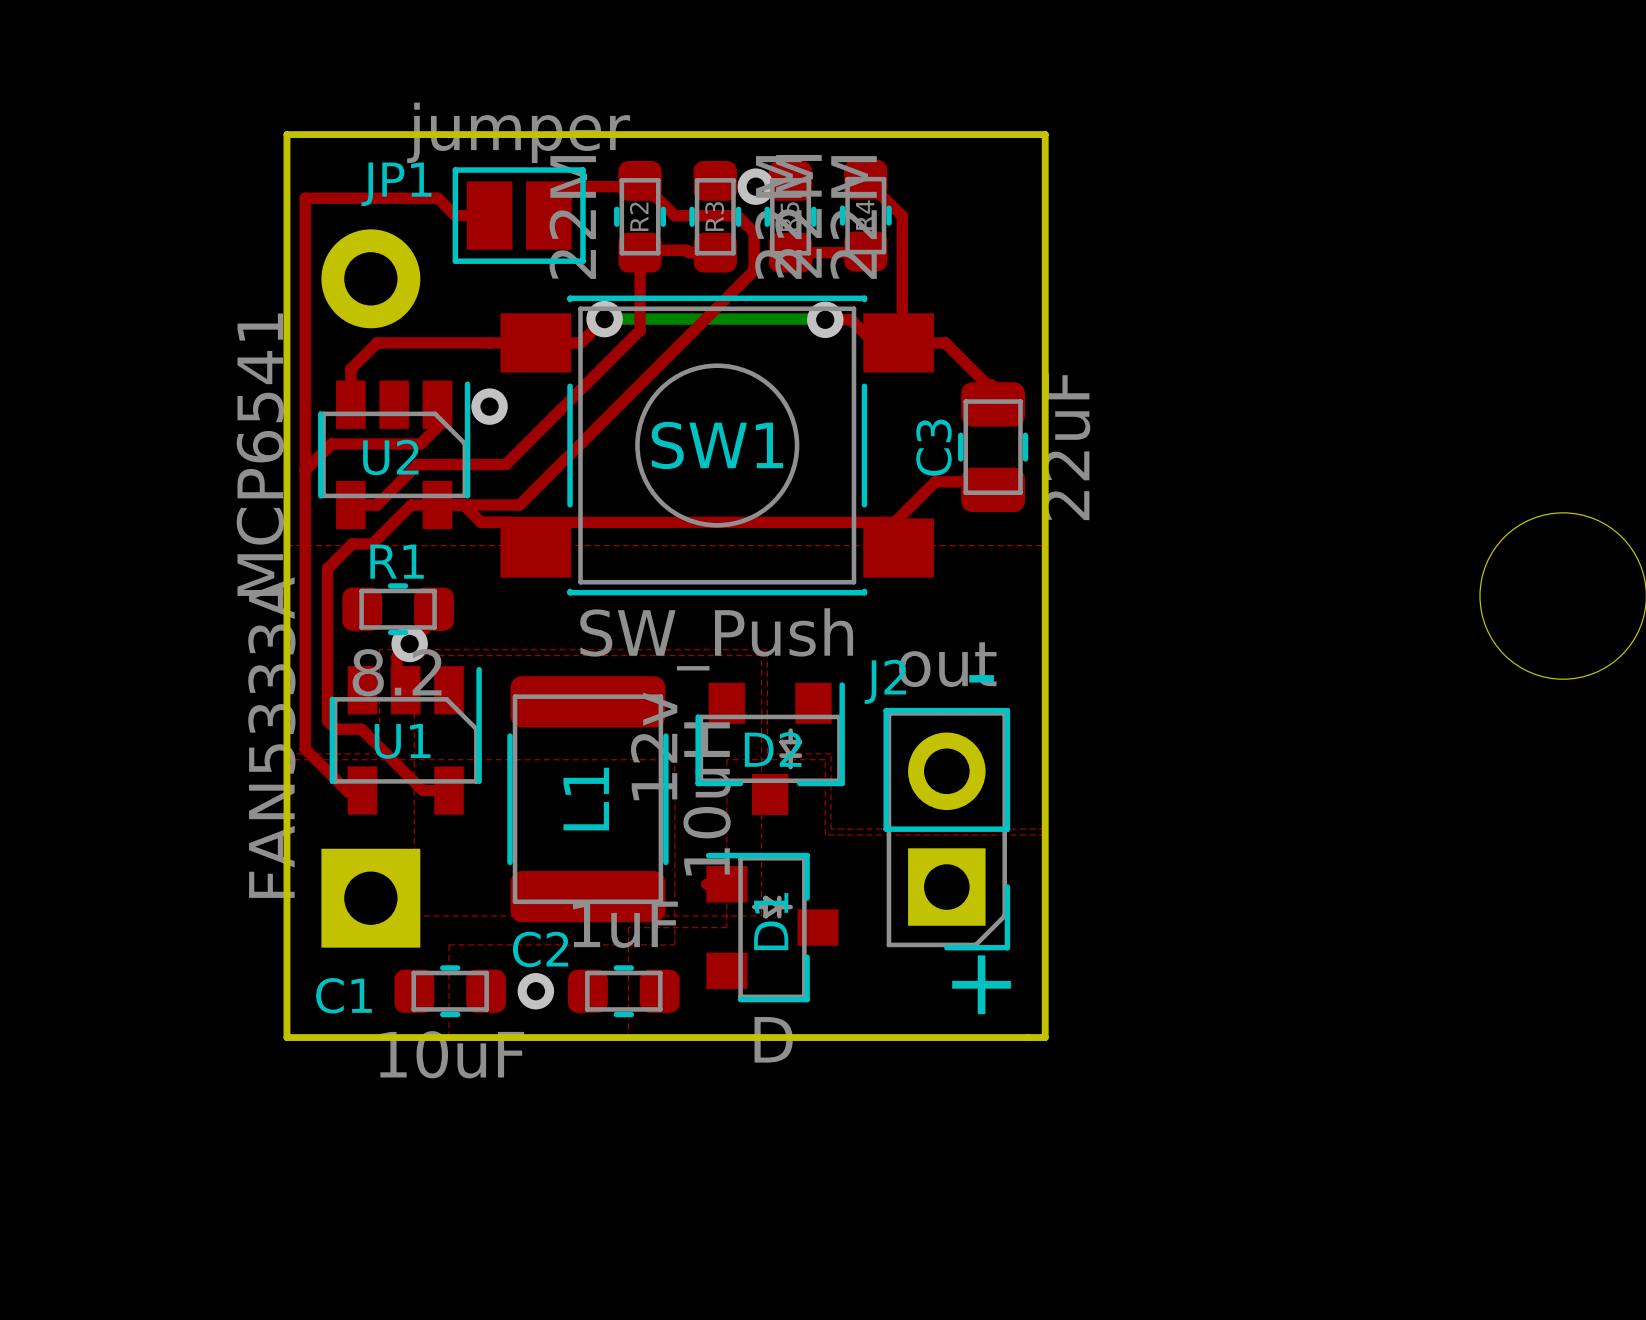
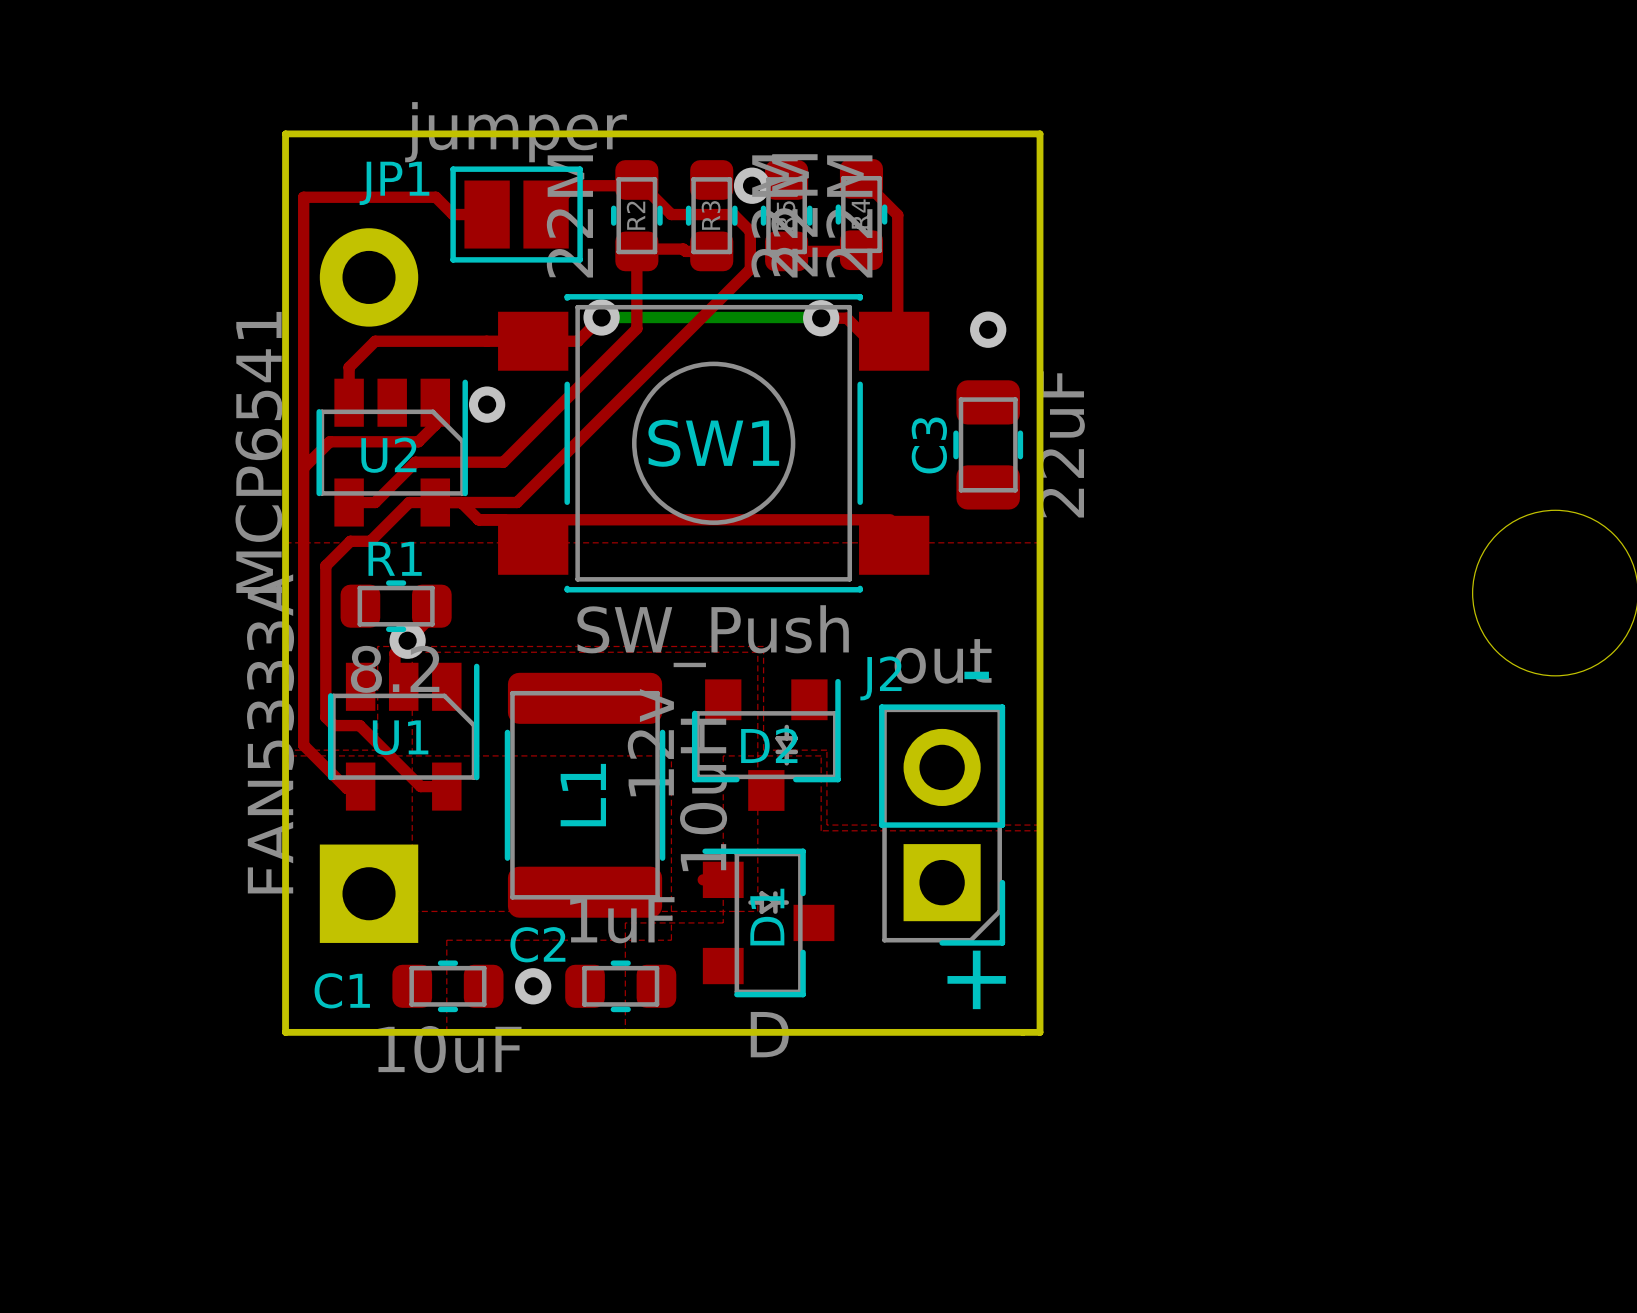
via: none -> (988, 329)
top track: (923, 342) (945, 342) (987, 384) (991, 384) (993, 386) (993, 411) -> none
top track: (993, 481) (935, 481) (894, 522) -> none

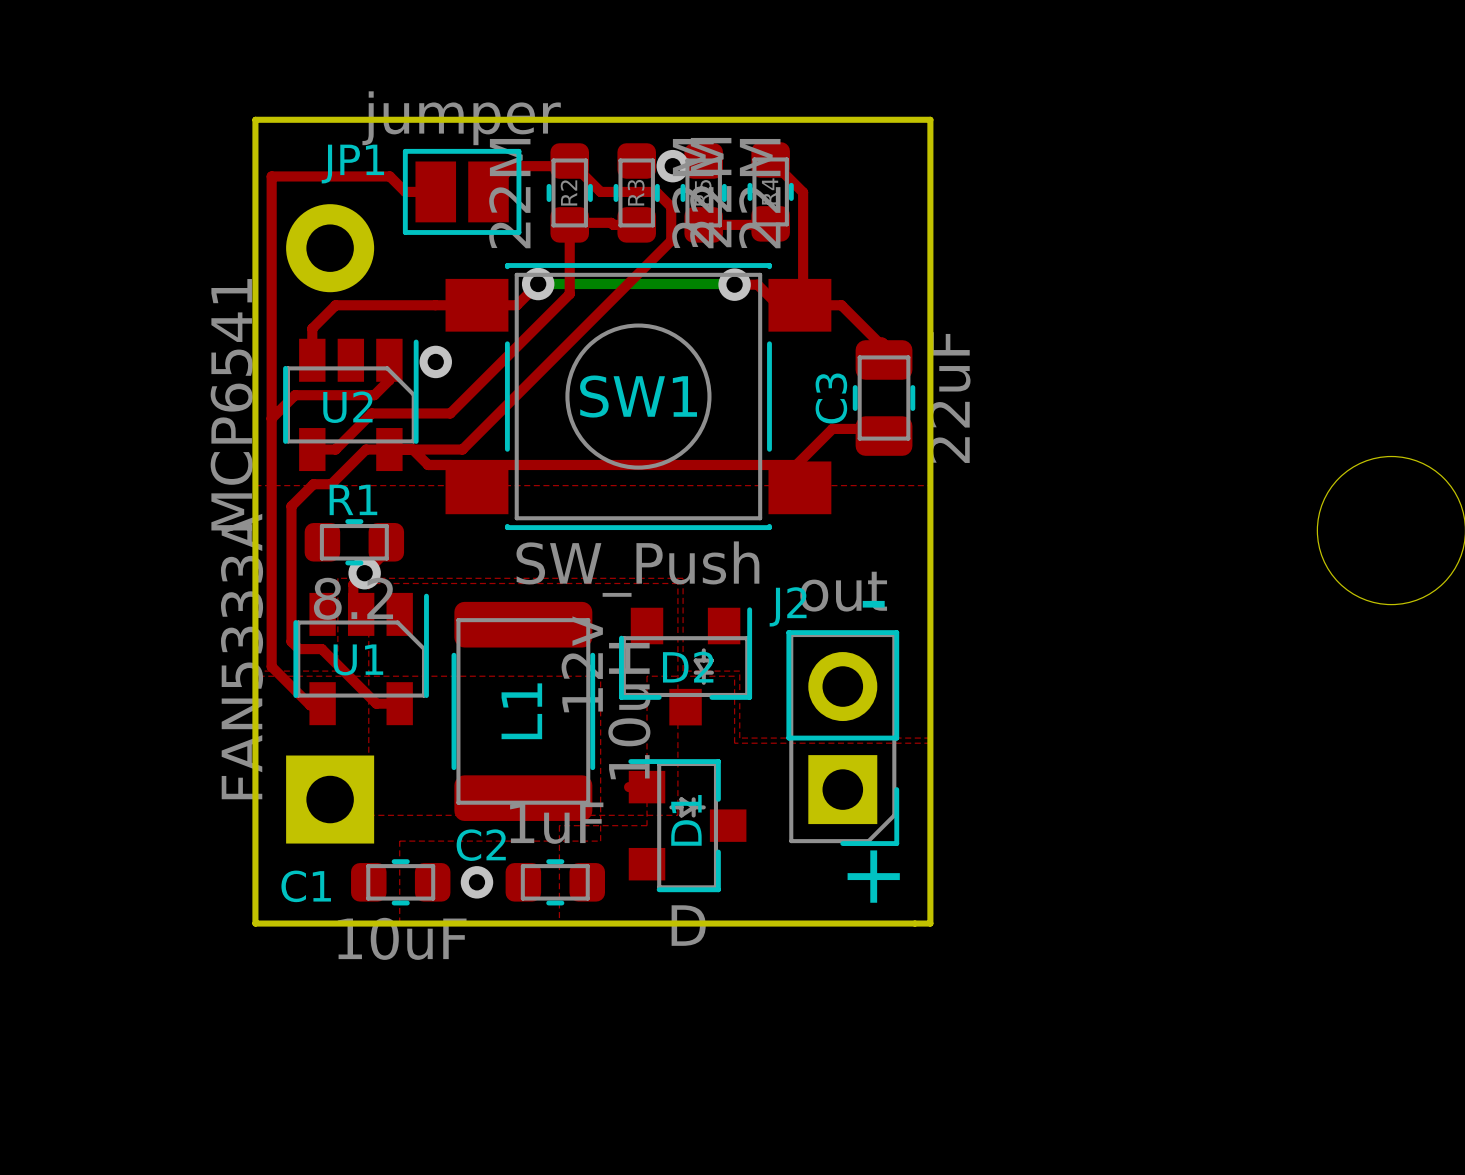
via: (988, 329) -> none
top track: none -> (822, 305) (841, 305) (878, 342) (882, 342) (884, 344) (884, 366)
top track: none -> (884, 428) (832, 428) (796, 464)

